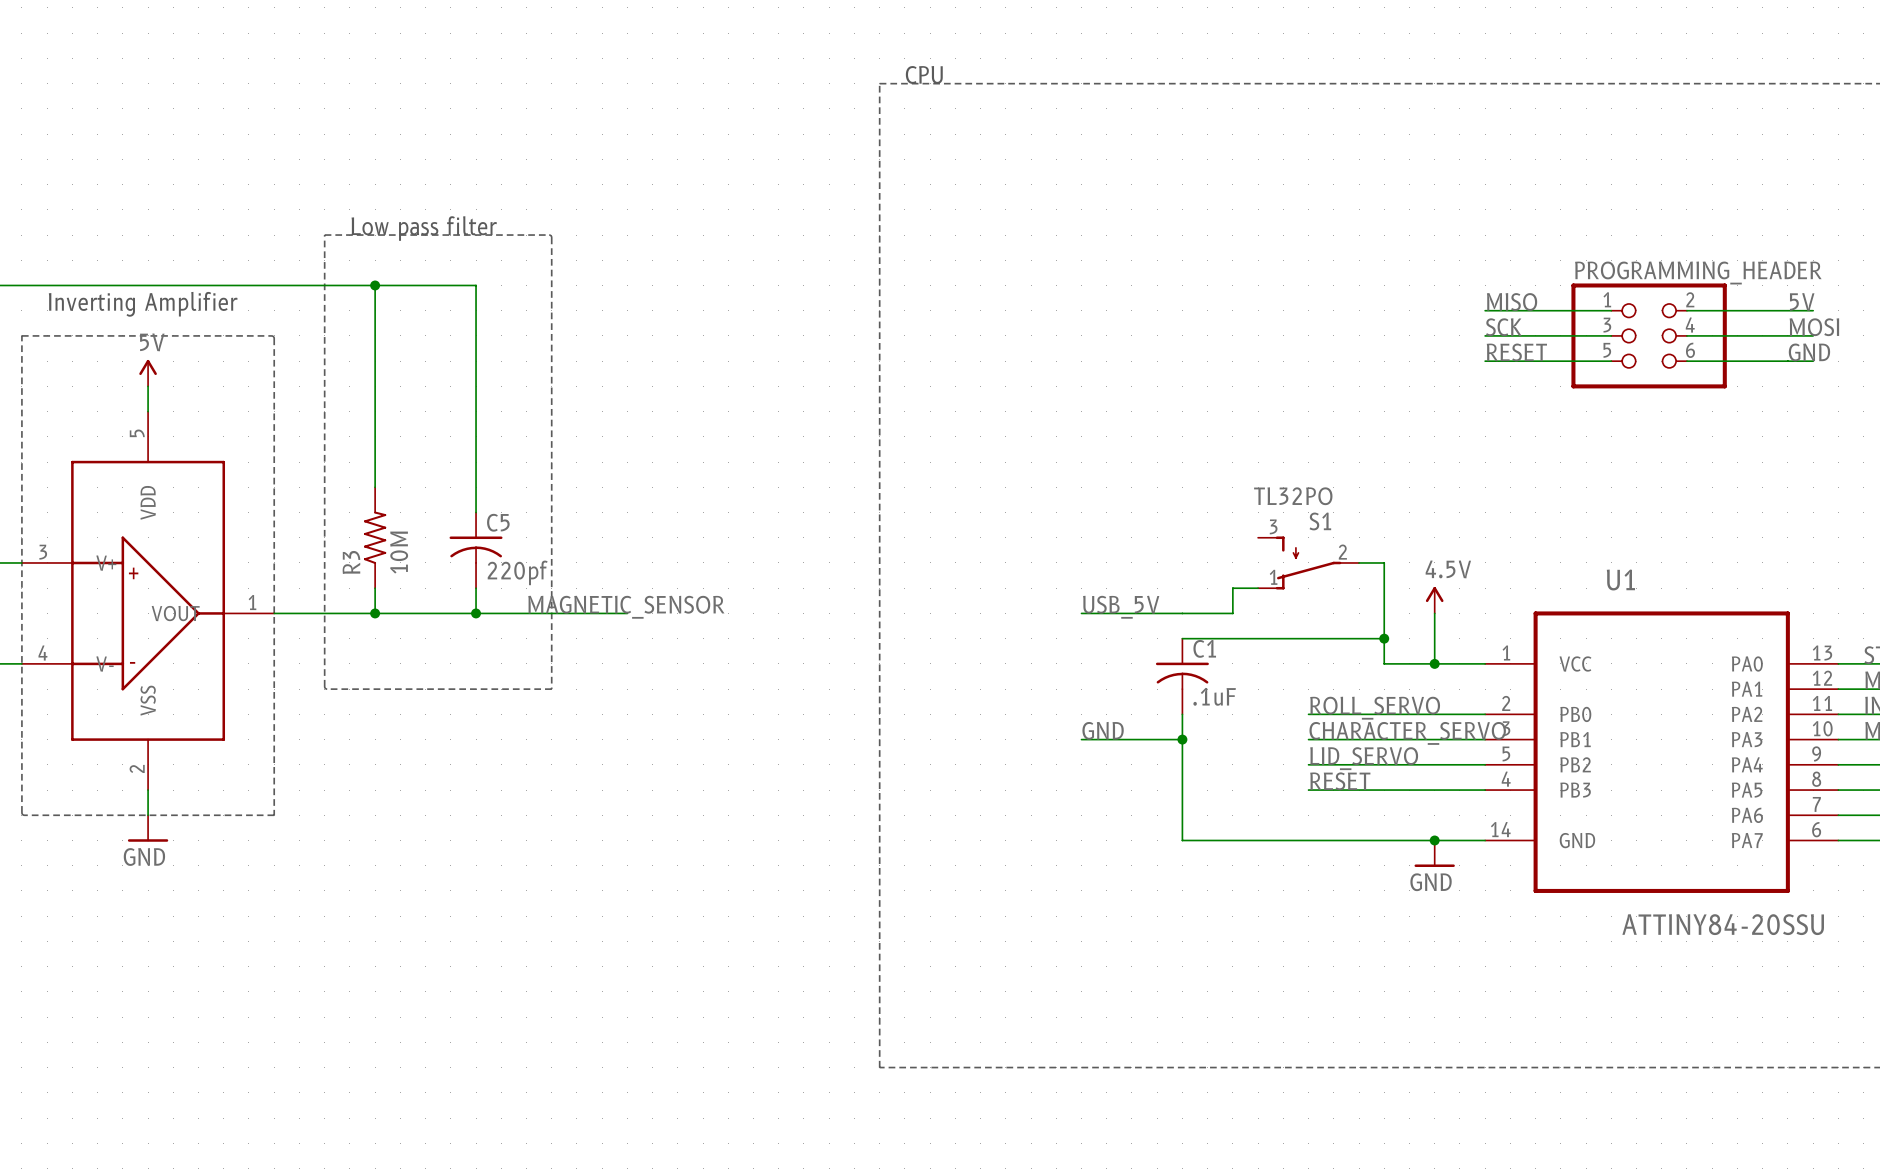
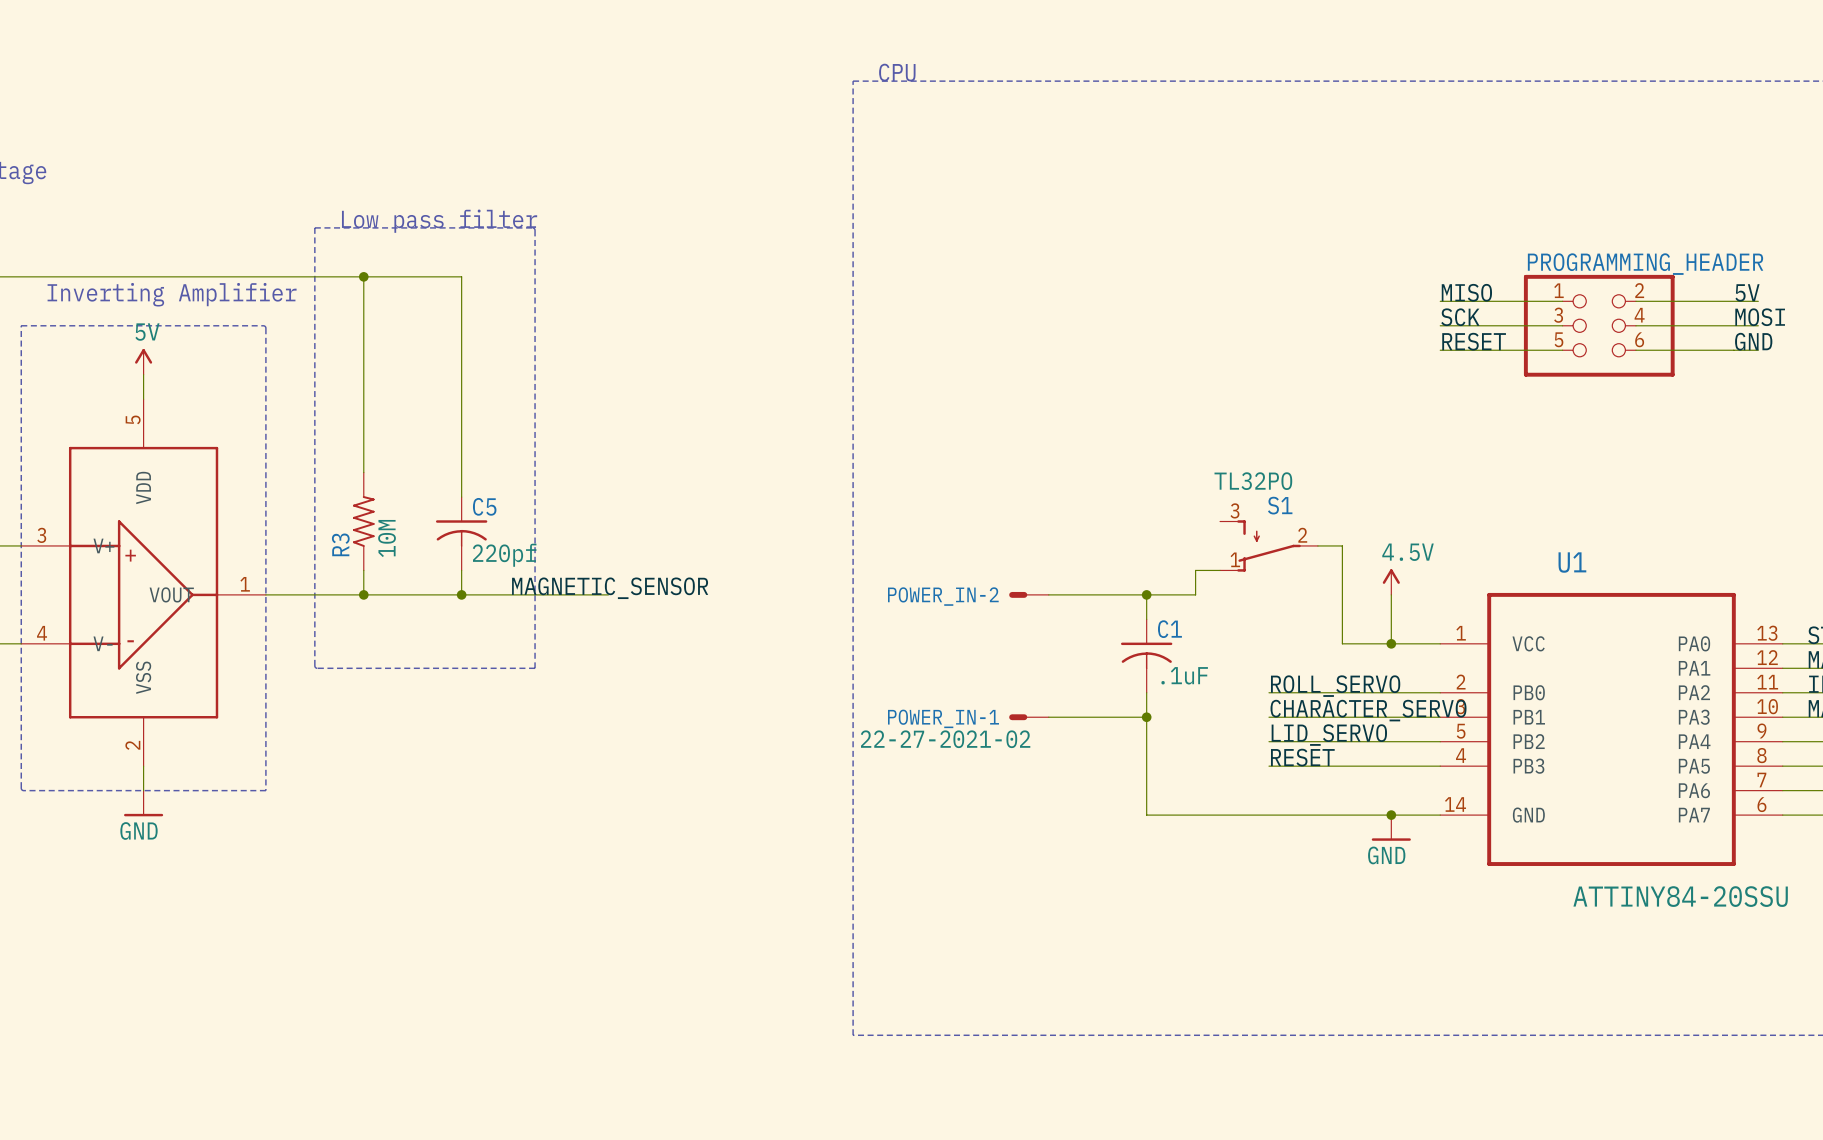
label: USB_5V (1121, 607) -> none
POWER_IN-2: none -> (1028, 594)
junction: none -> (1146, 594)
wire: (1182, 638) (1384, 638) -> (1146, 619) (1146, 594)
junction: (1384, 638) -> none
label: GND (1103, 730) -> none
POWER_IN-1: none -> 22-27-2021-02 (1028, 717)

